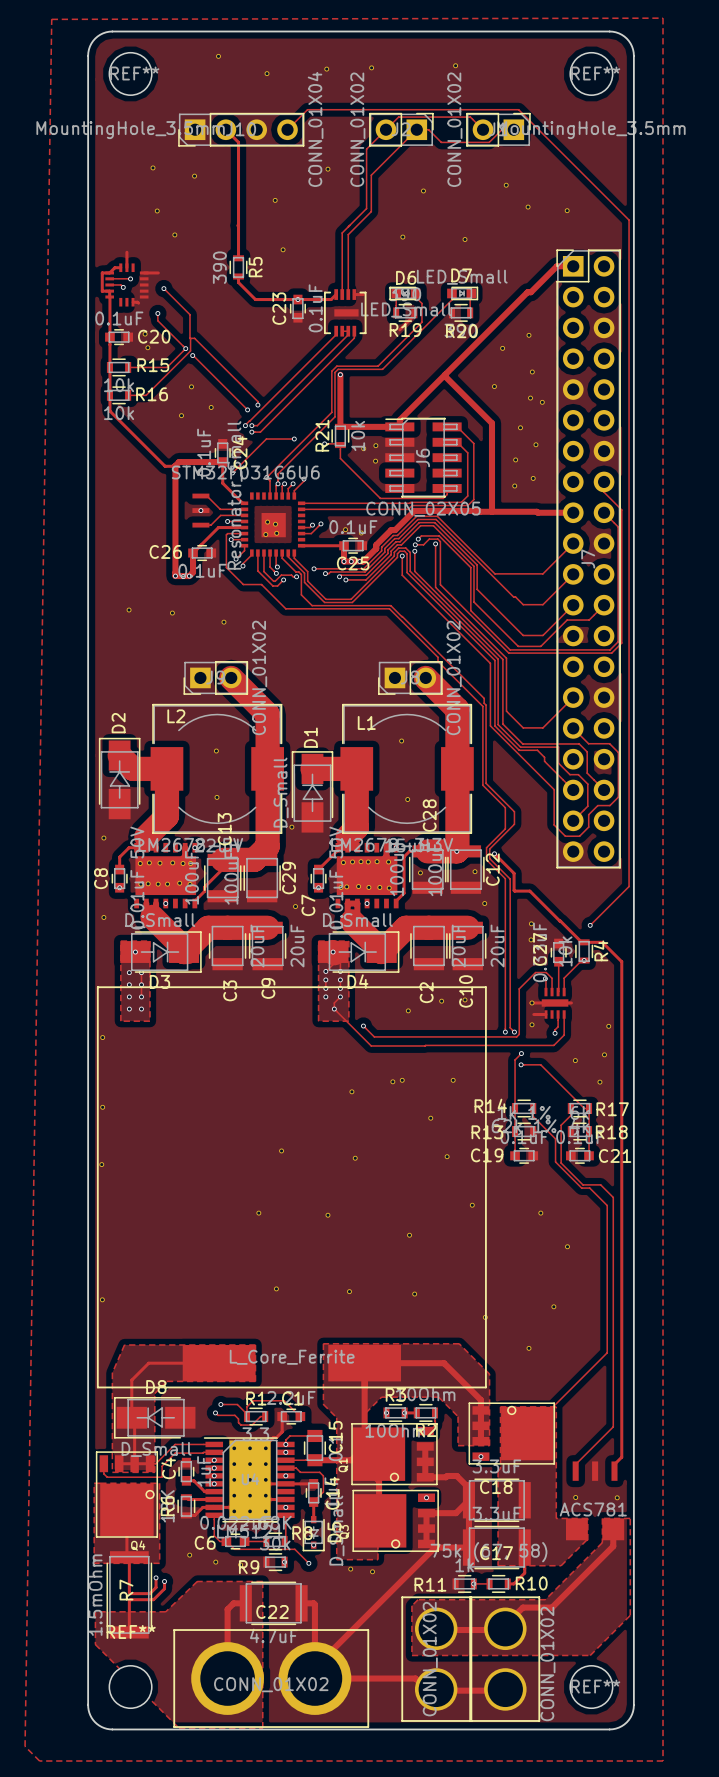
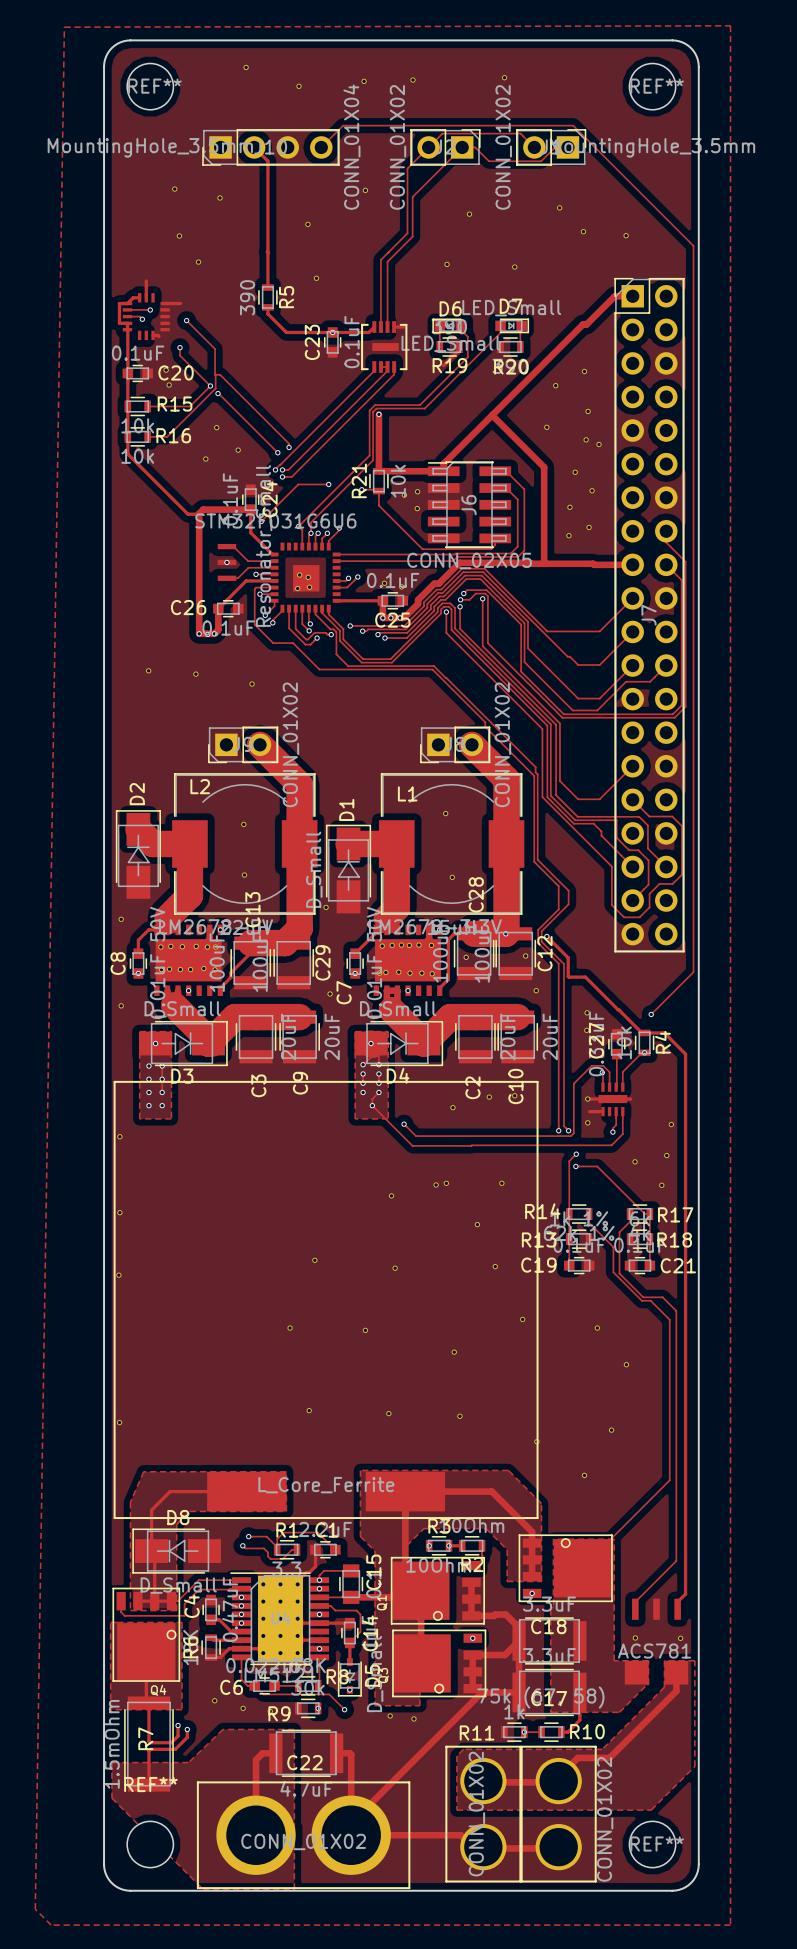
C4 value: 1uF (204, 1471) -> 0.47uF (230, 1609)

